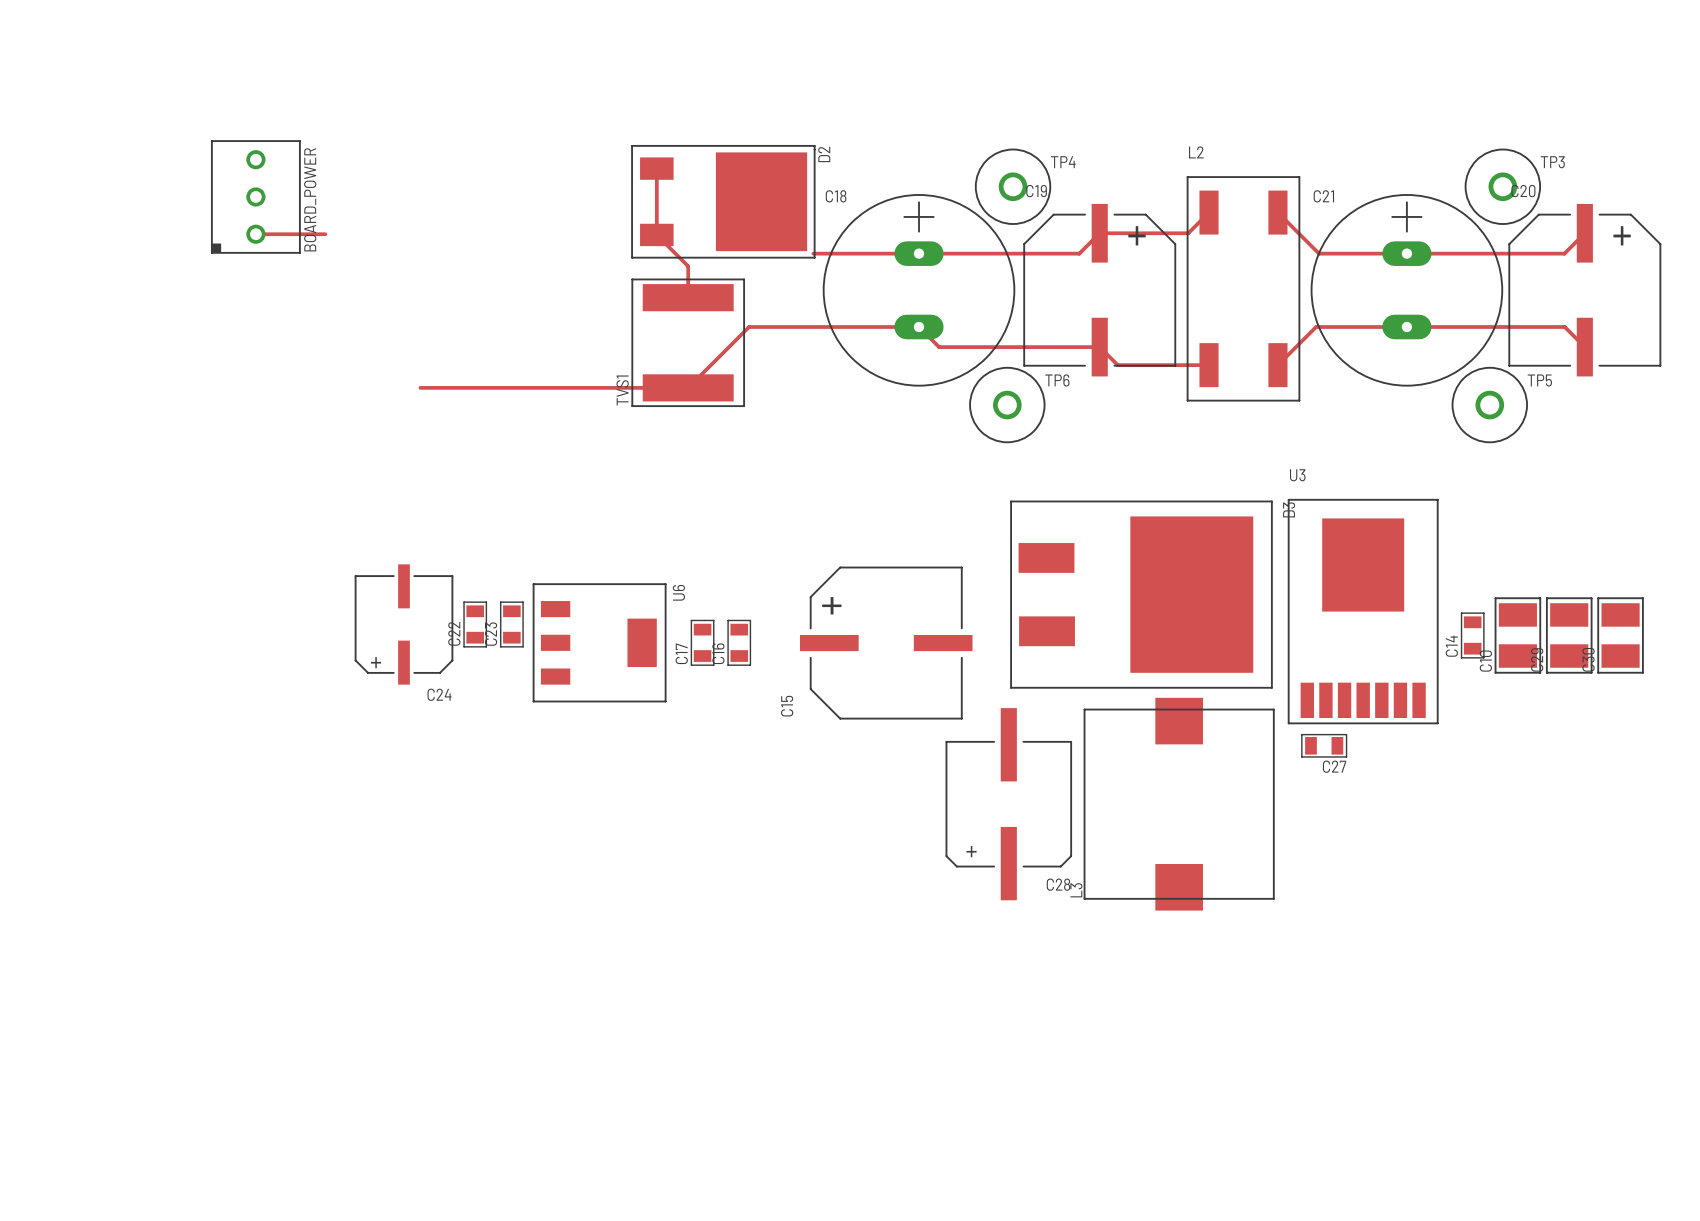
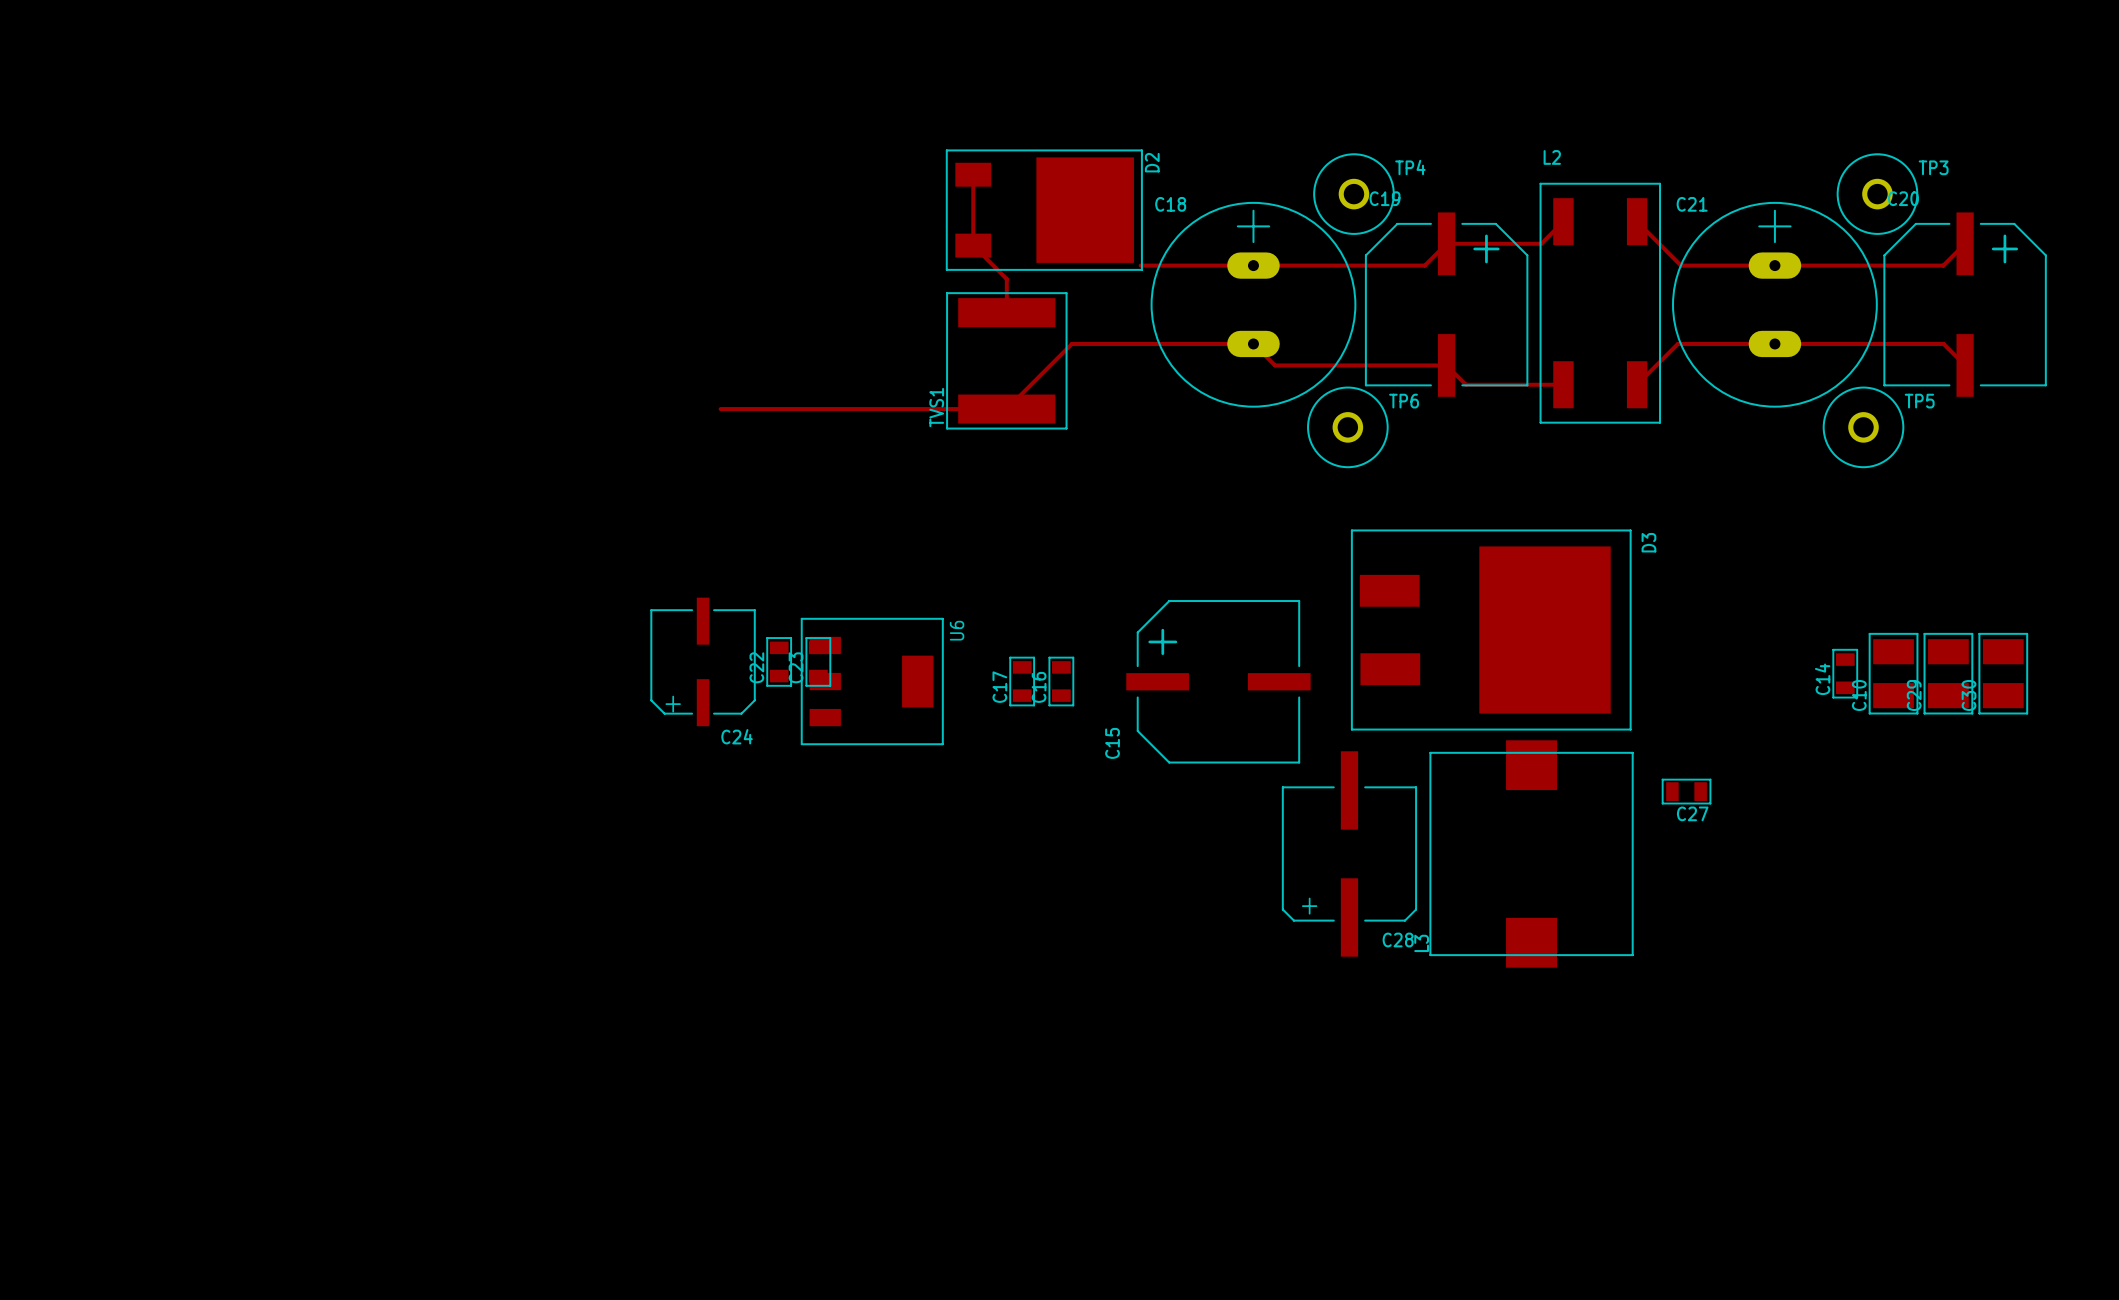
BOARD_POWER: (255, 196) -> none
top track: (255, 234) (325, 234) -> none
U3: (1363, 611) -> none
U6 position: (599, 642) -> (872, 681)

